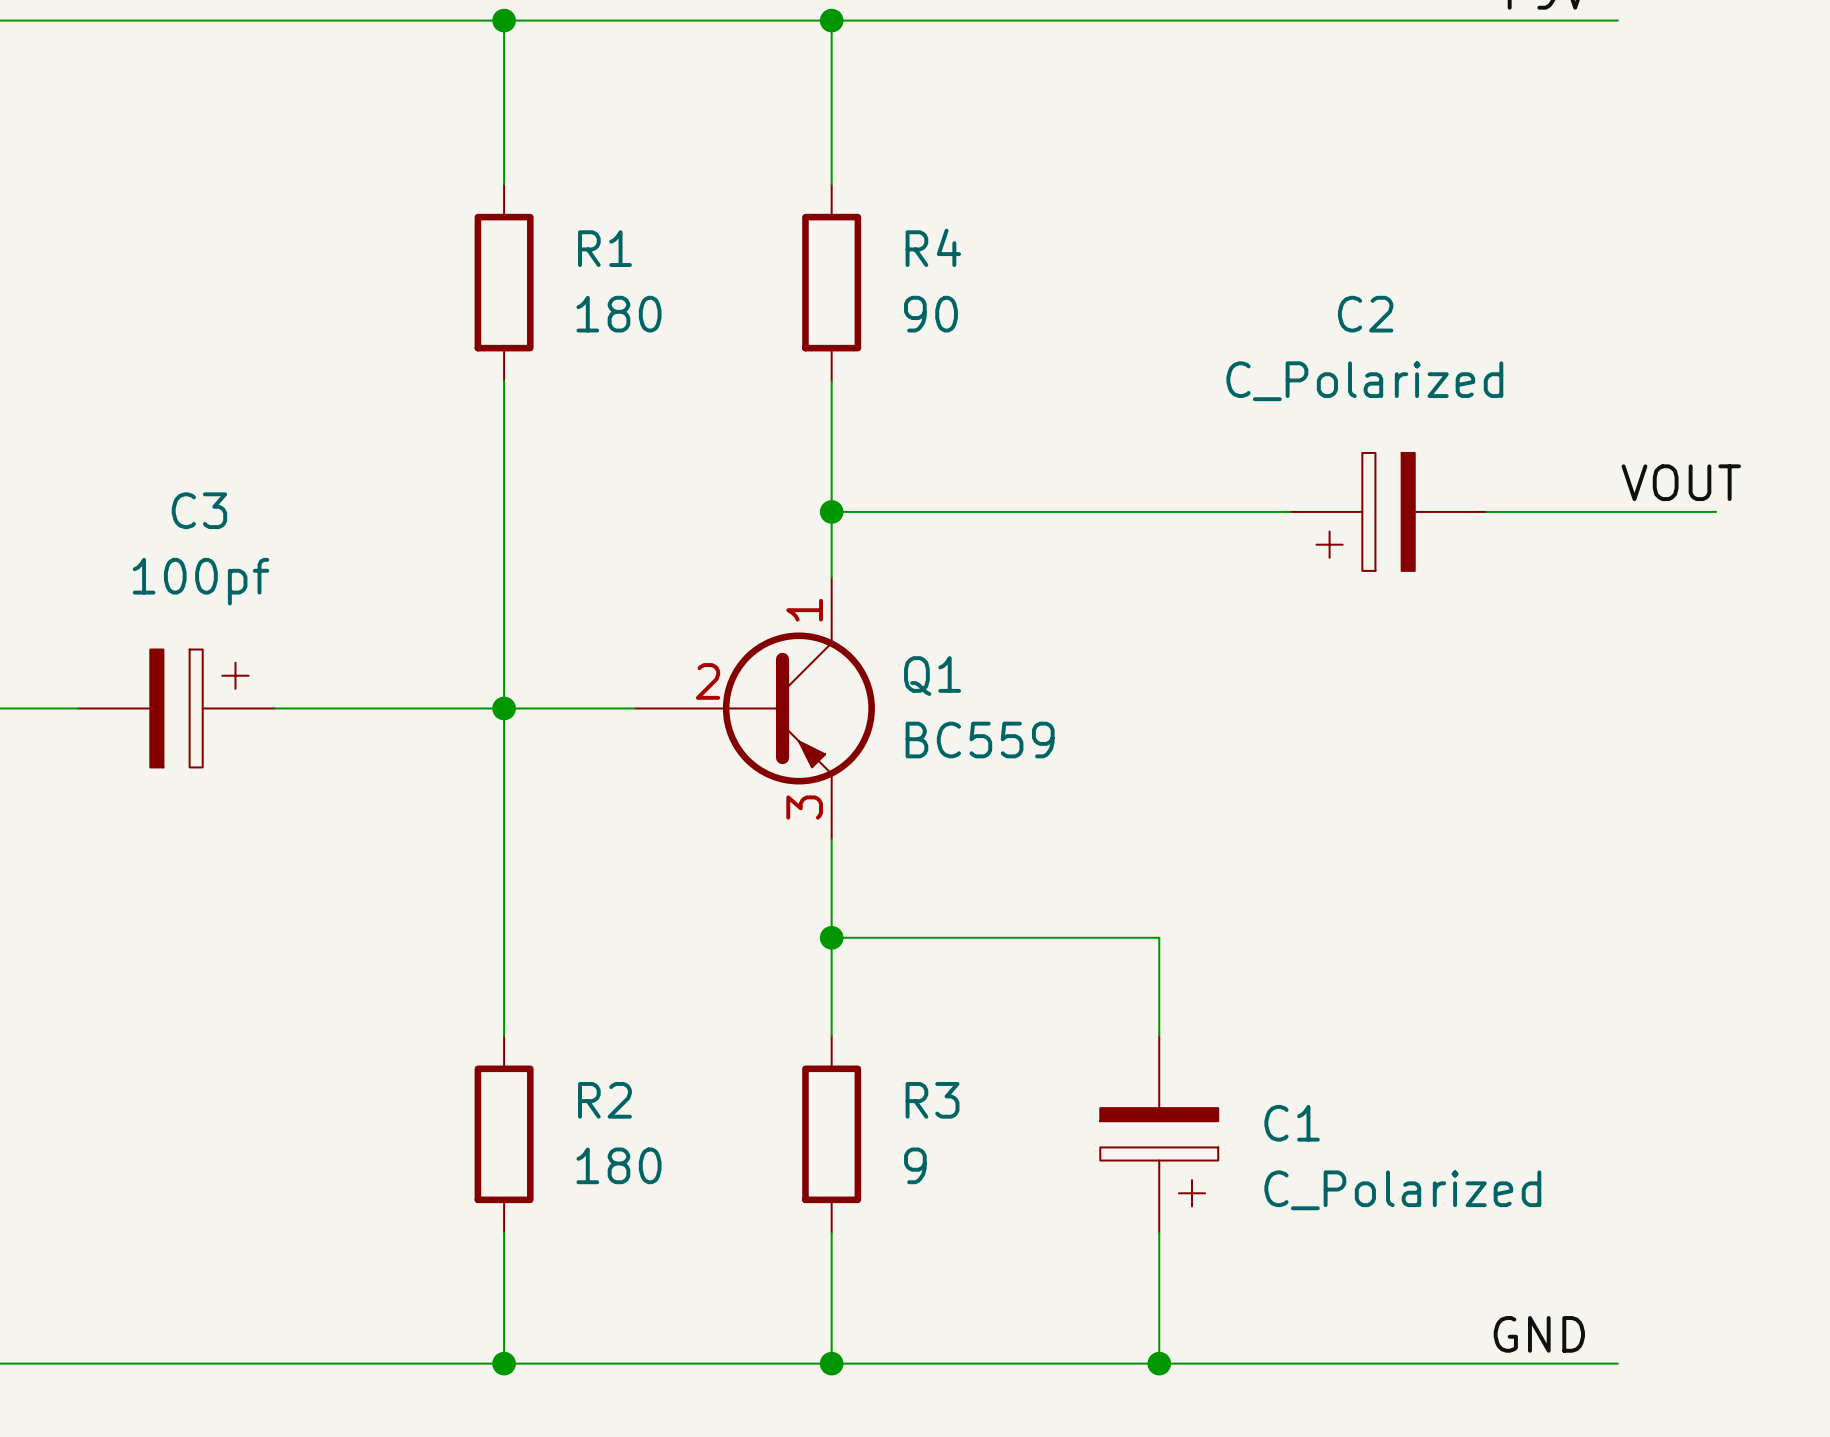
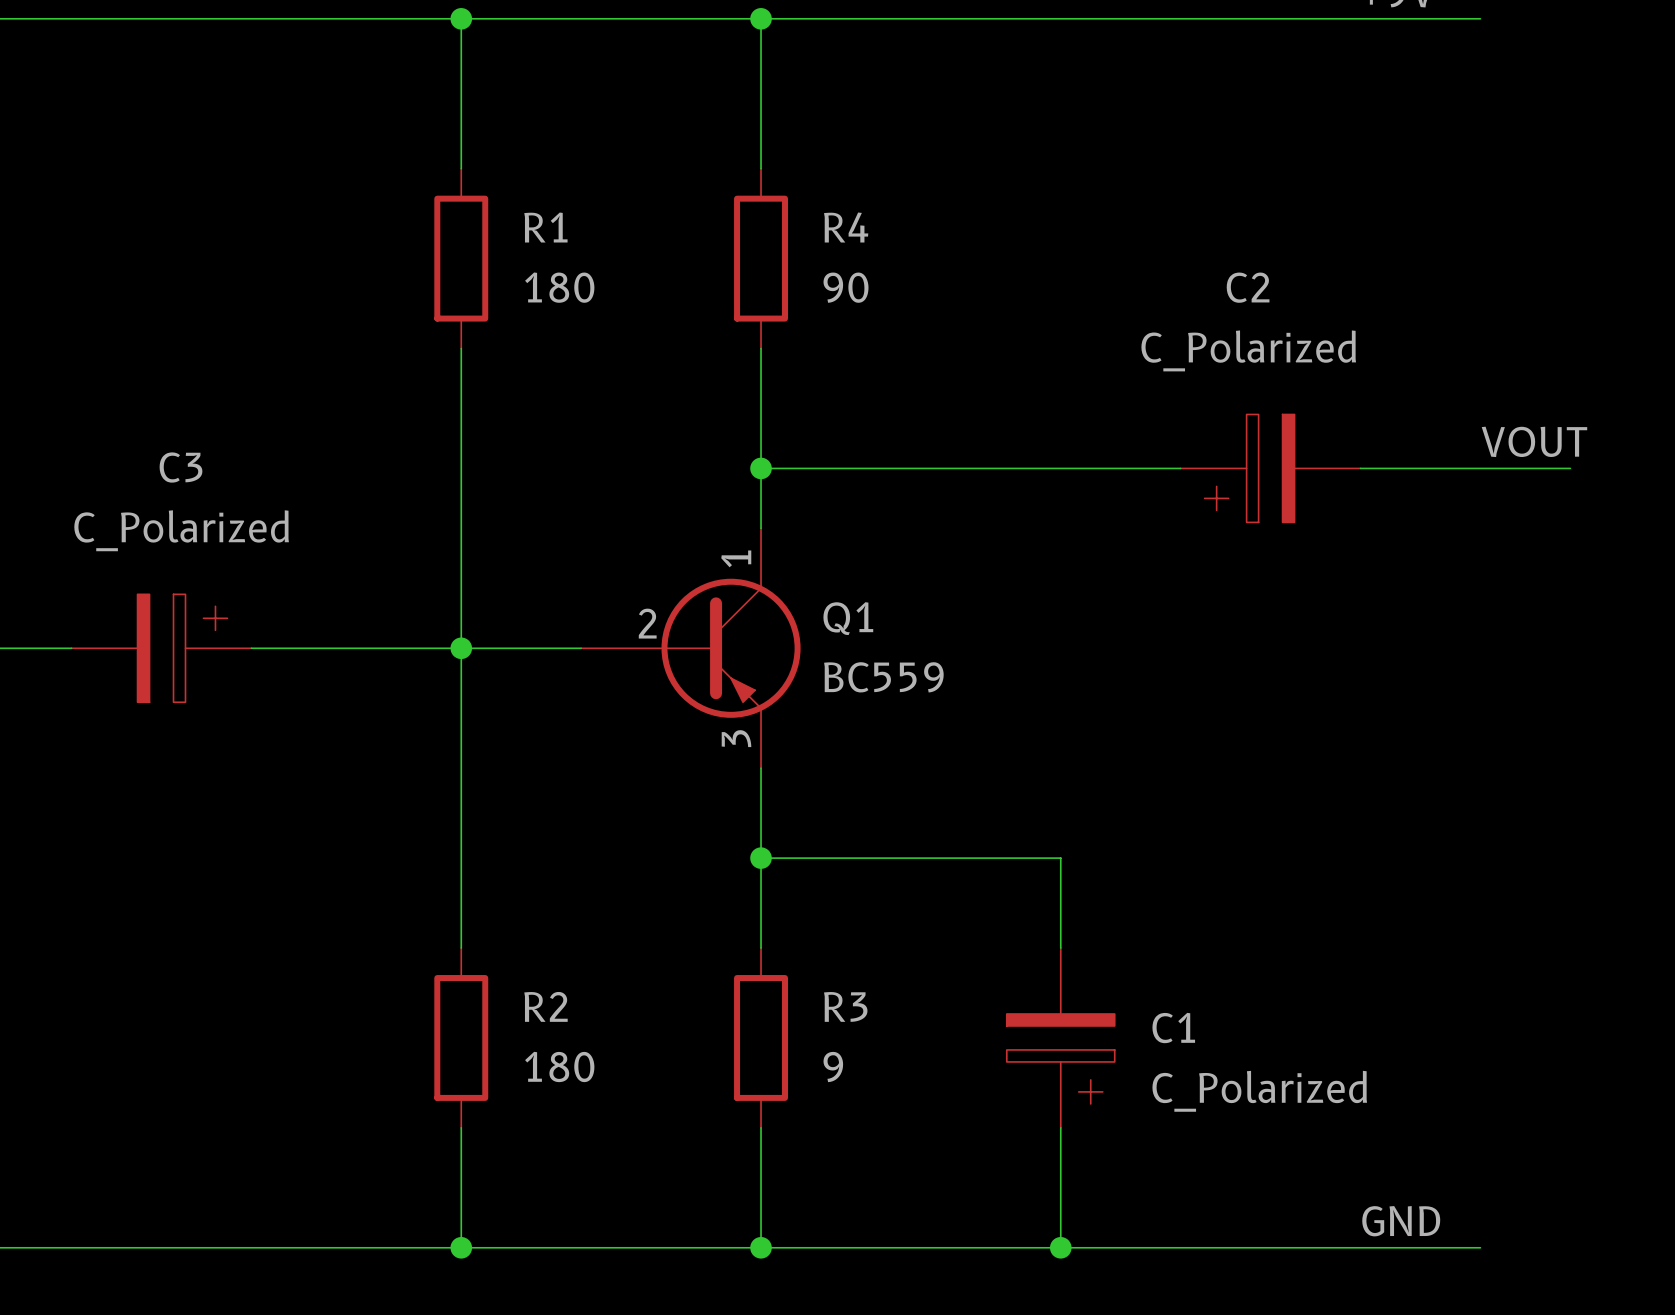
C3 value: 100pf (201, 581) -> C_Polarized (181, 530)

